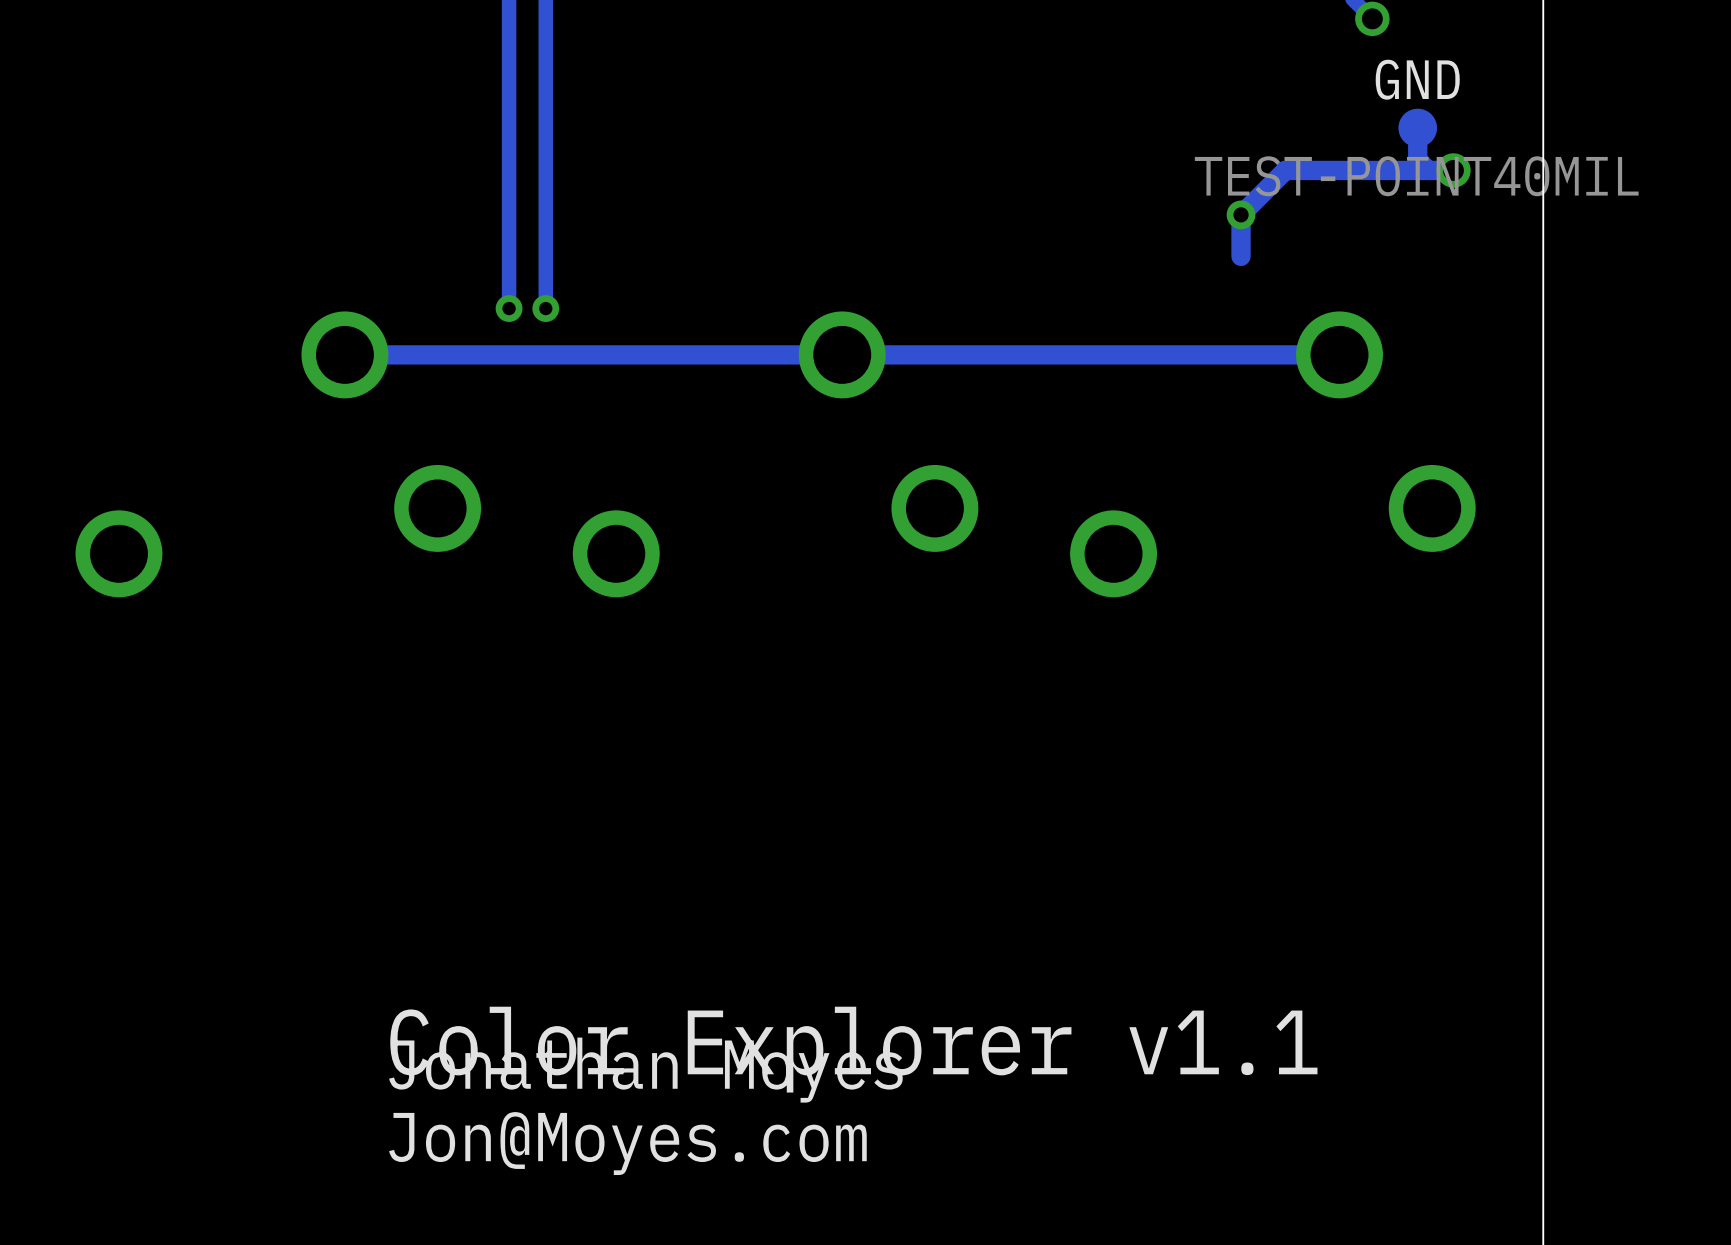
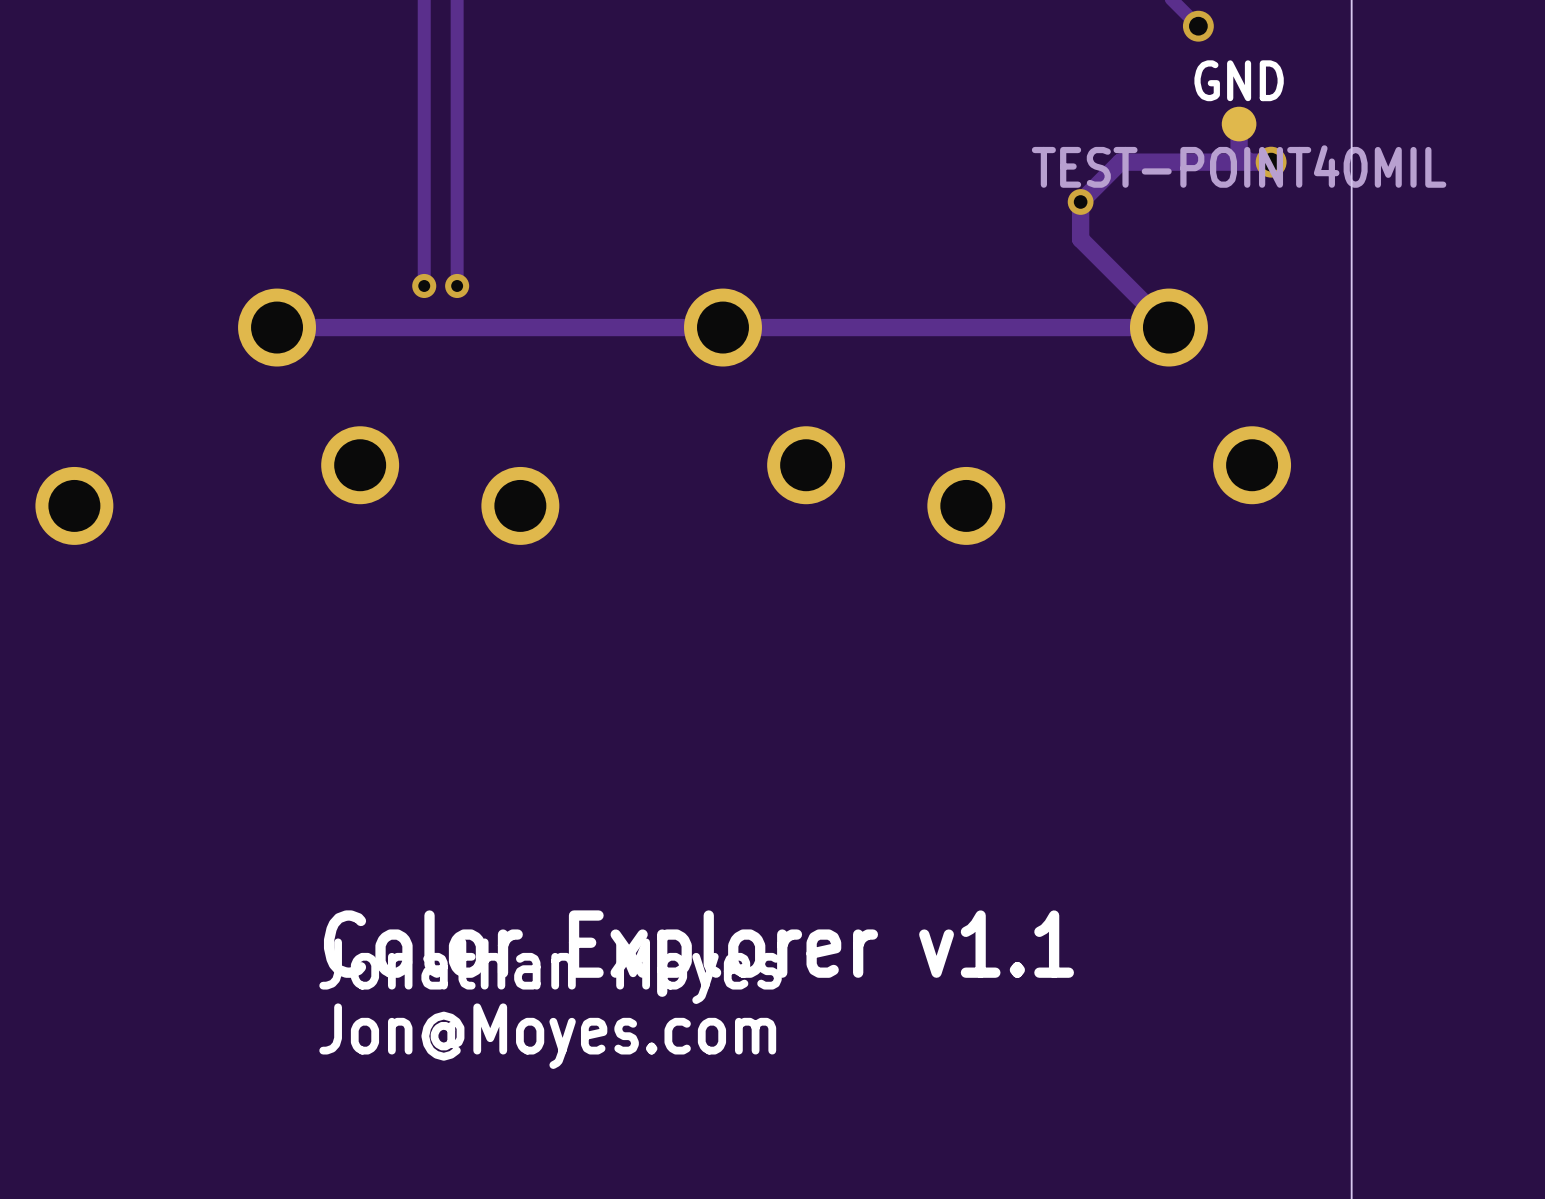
track: none -> (1080, 239) (1168, 327)

